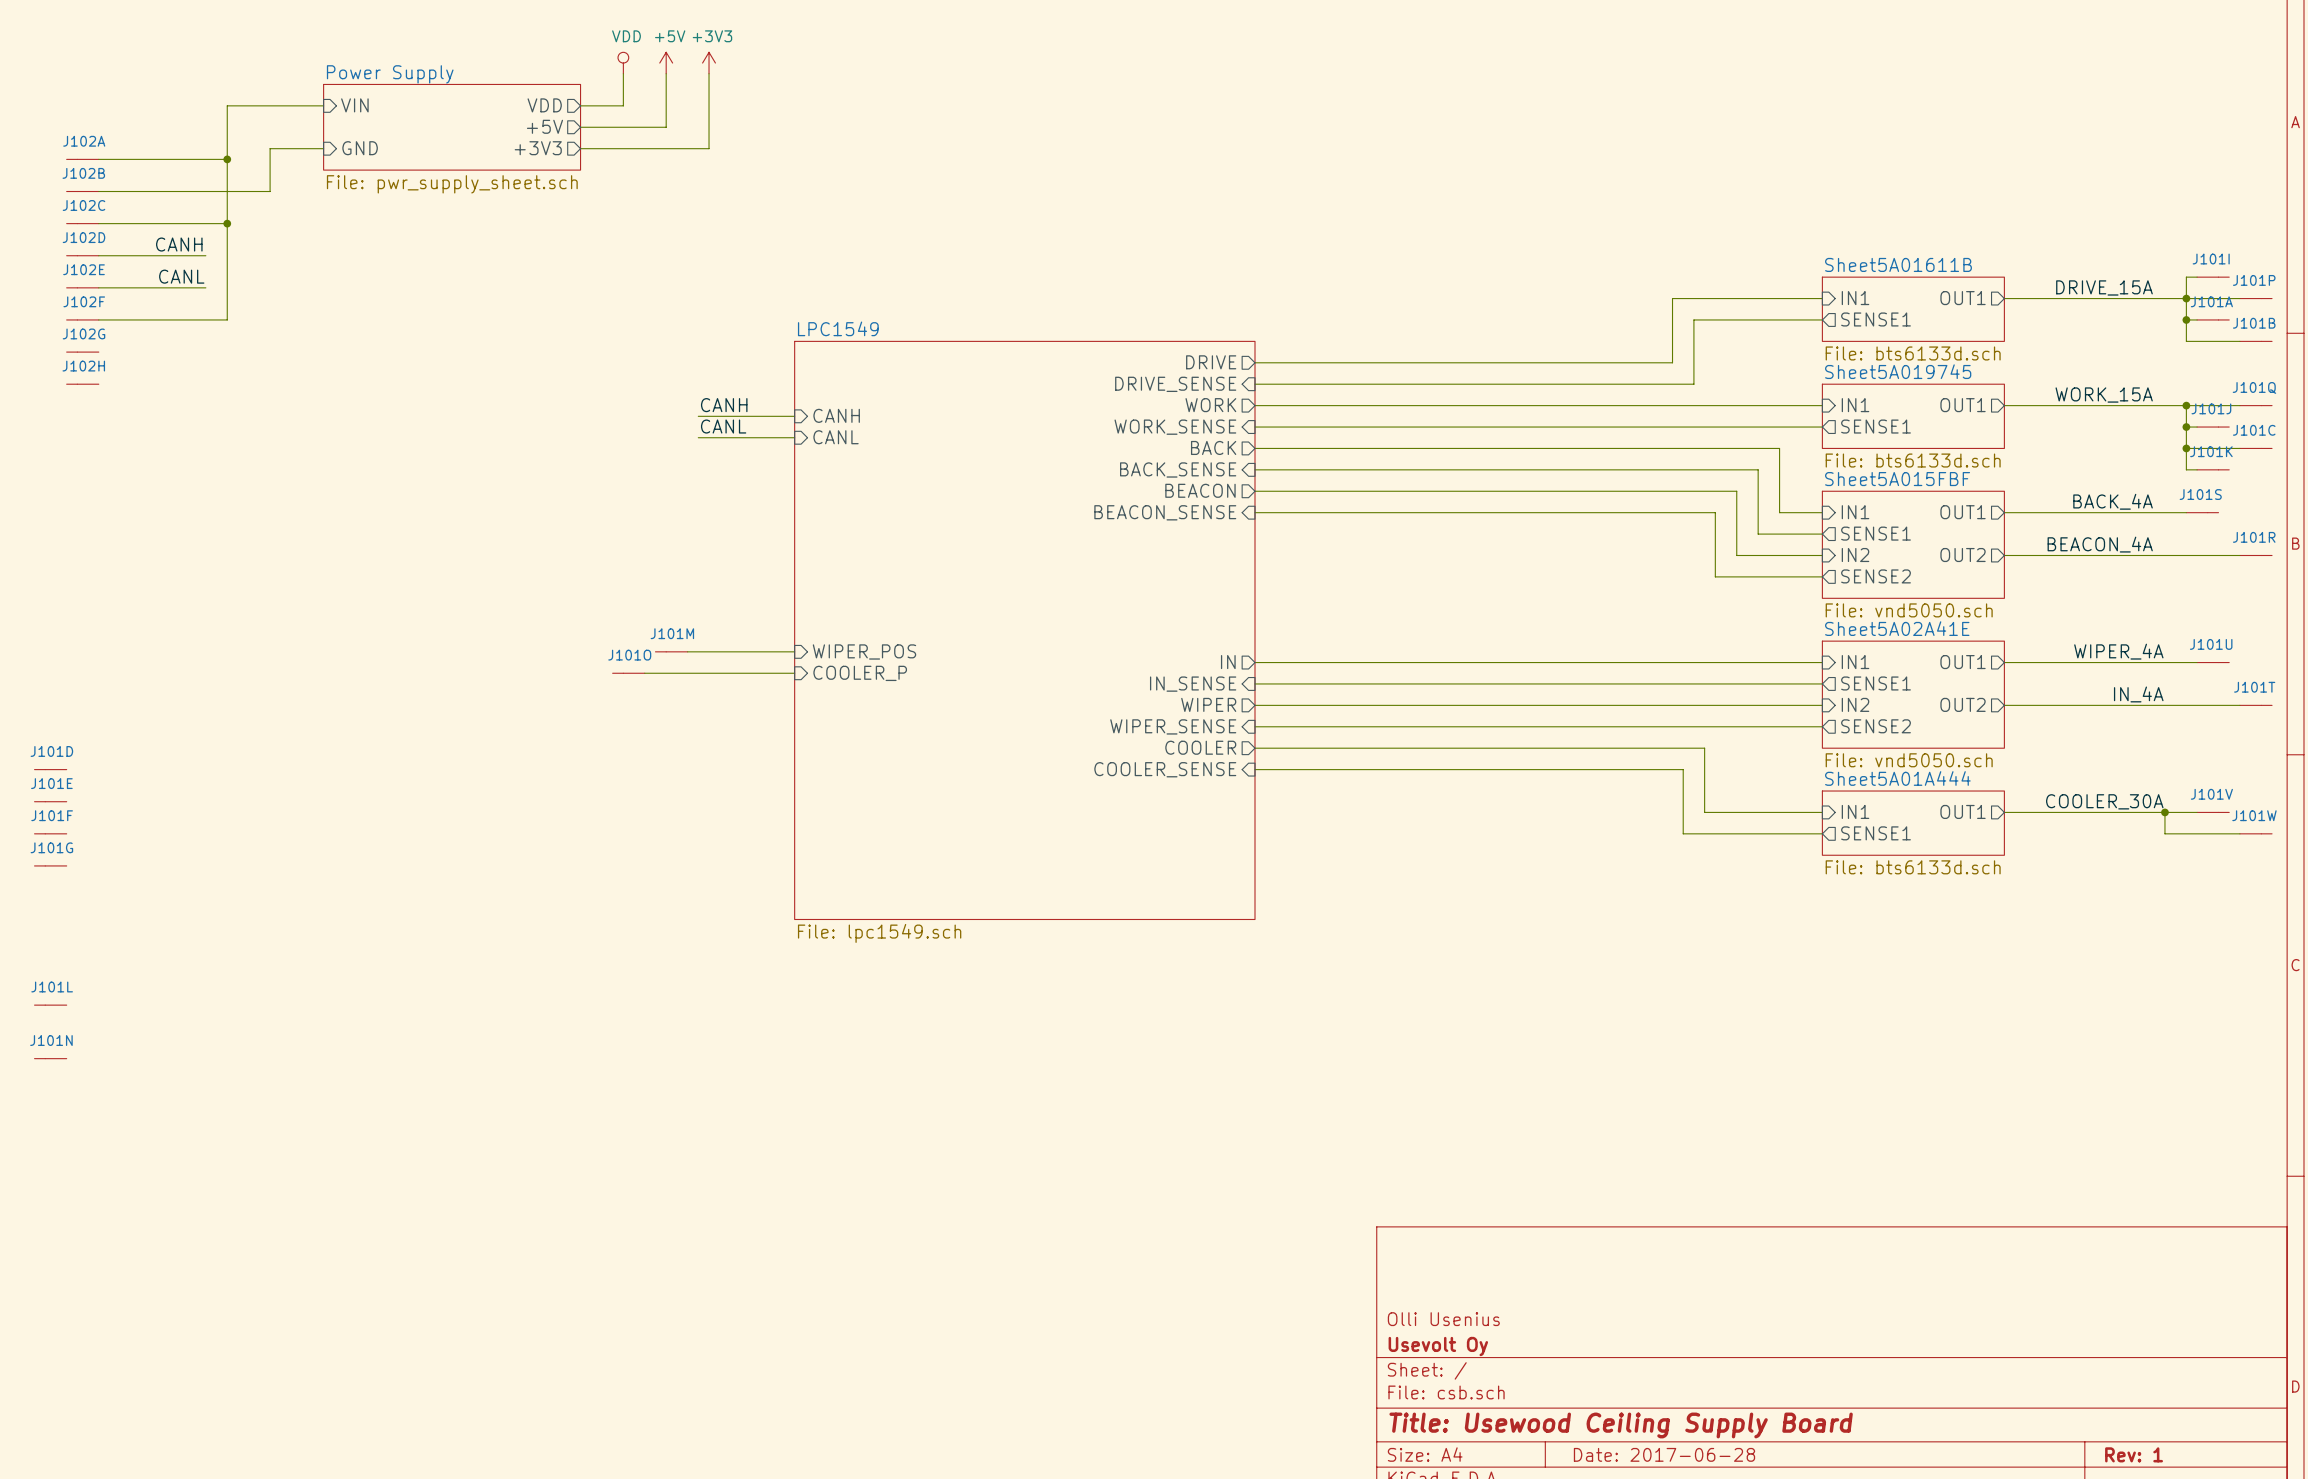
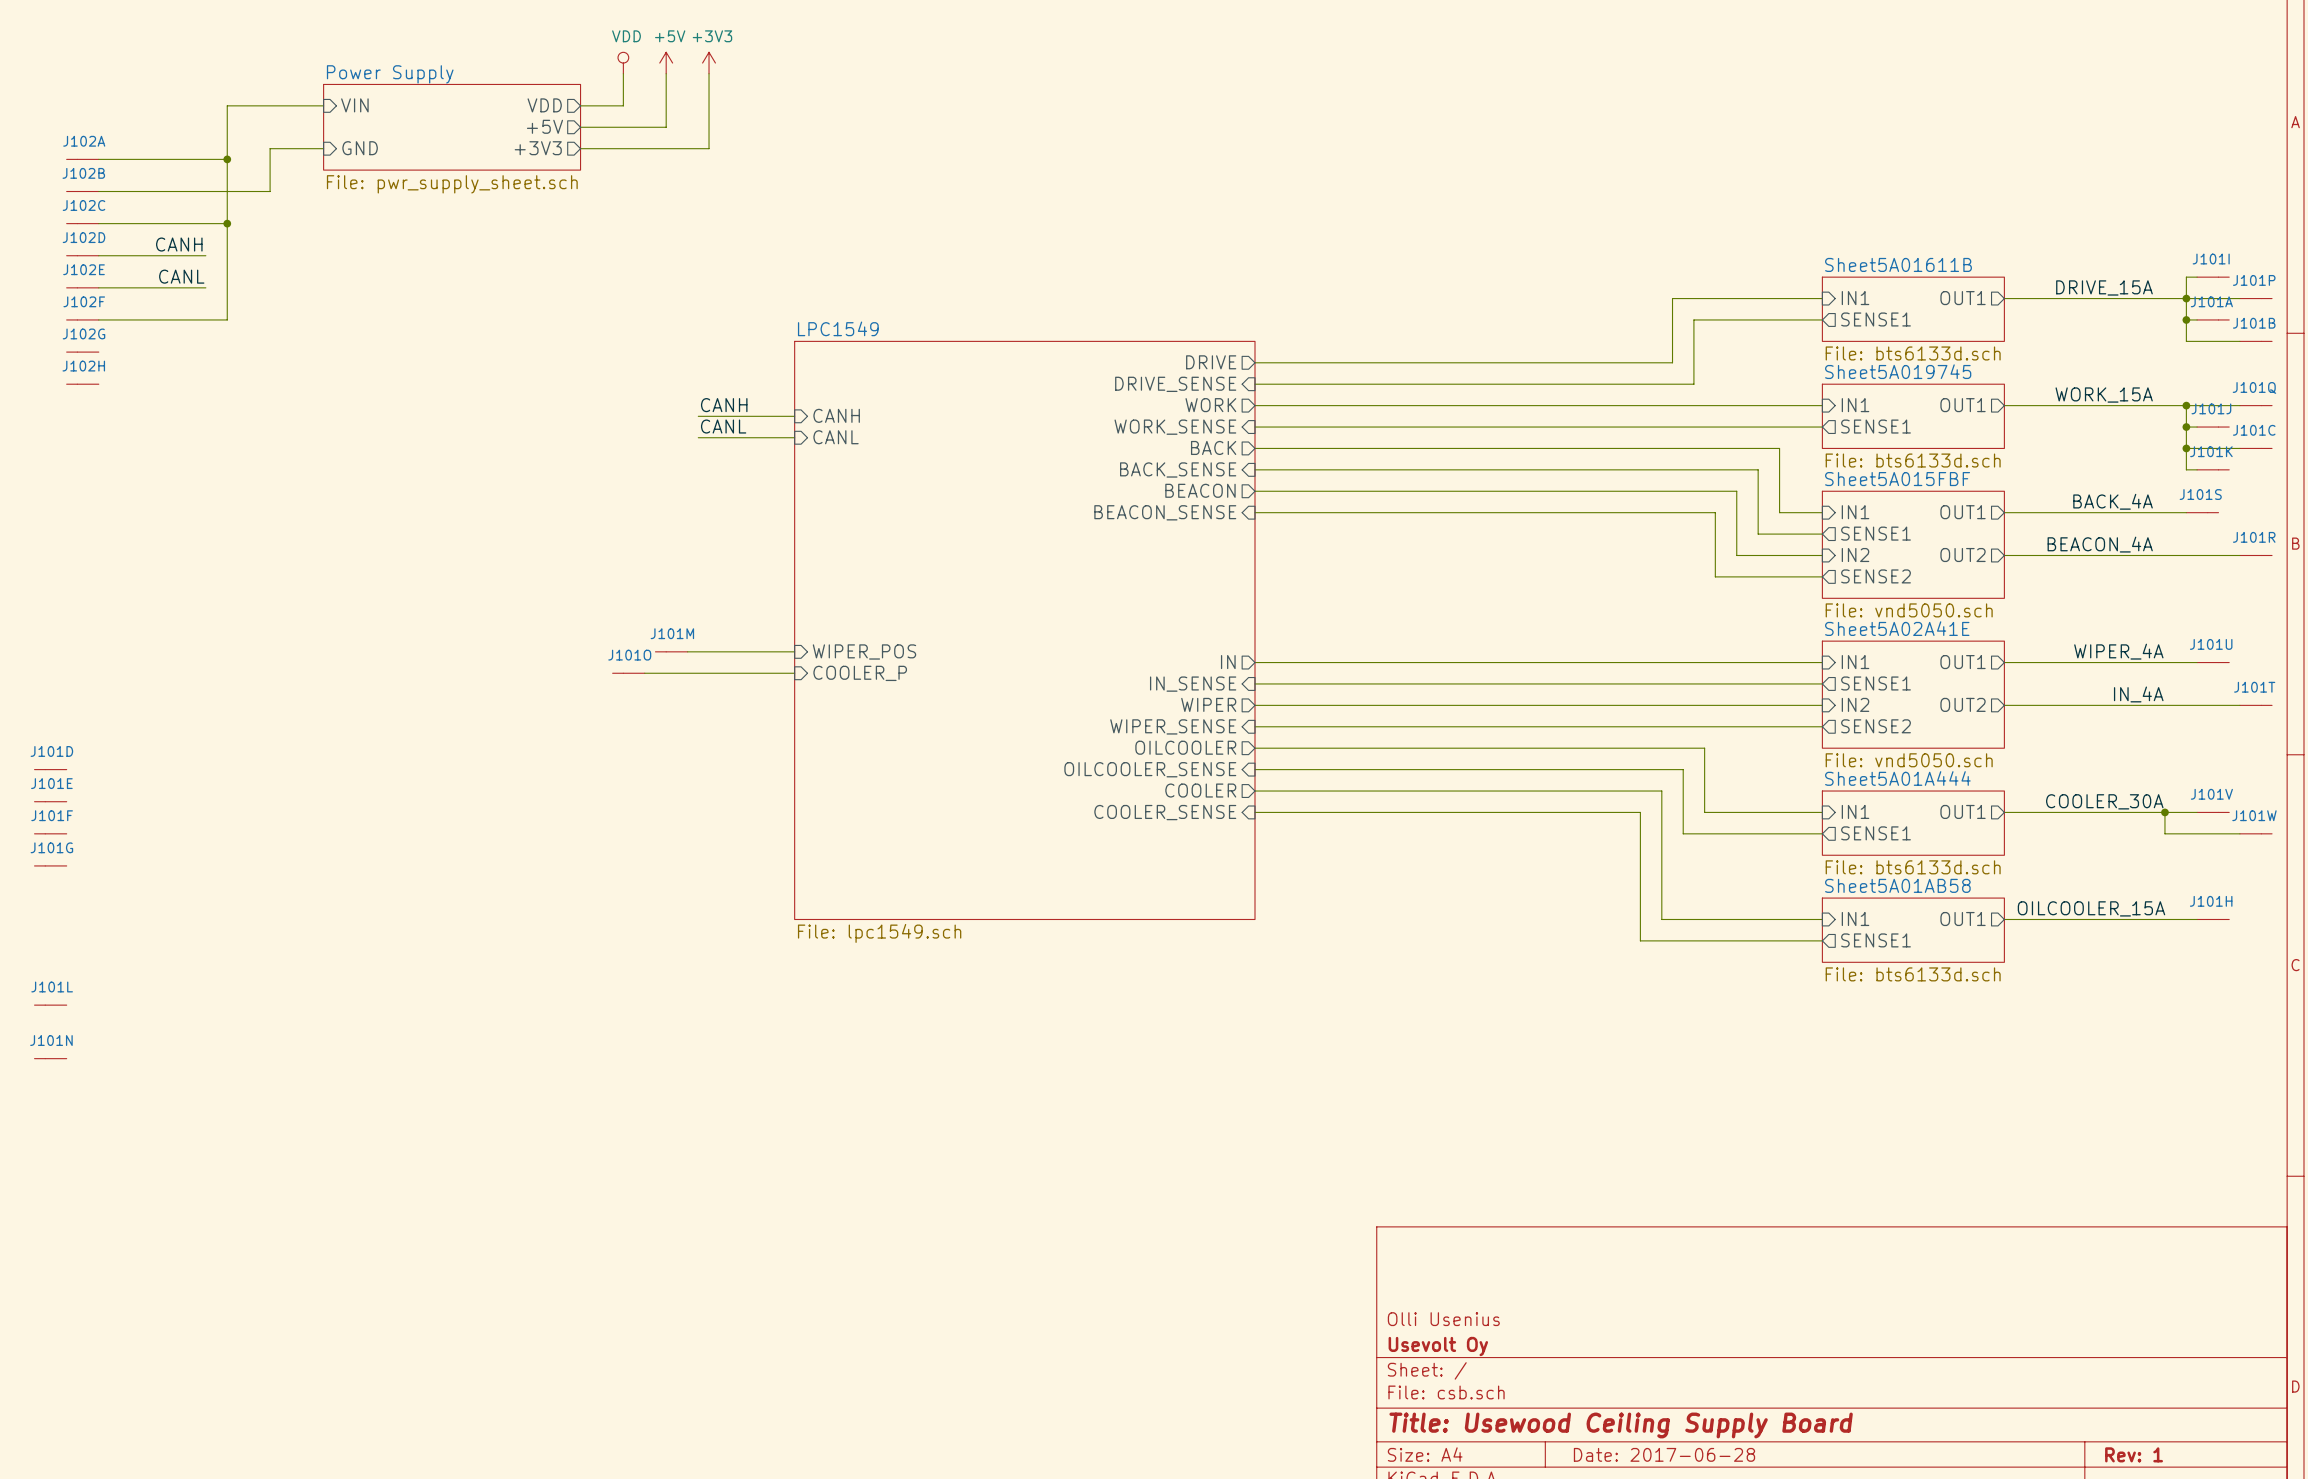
sheet pin: COOLER (1200, 747) -> OILCOOLER (1185, 747)
sheet pin: COOLER_SENSE (1165, 769) -> OILCOOLER_SENSE (1150, 769)
sheet pin: none -> COOLER (1200, 790)
wire: none -> (1254, 791) (1661, 791) (1661, 919) (1822, 919)
sheet pin: none -> COOLER_SENSE (1165, 812)
wire: none -> (1254, 812) (1640, 812) (1640, 940) (1822, 940)
label: none -> OILCOOLER_15A (2091, 908)
sheet pin: none -> IN1 (1855, 919)
sheet pin: none -> OUT1 (1963, 919)
wire: none -> (2004, 919) (2197, 919)
J101H: none -> (2213, 919)
sheet Sheet5A01AB58: none -> File: bts6133d.sch (1913, 930)
sheet pin: none -> SENSE1 (1876, 940)

